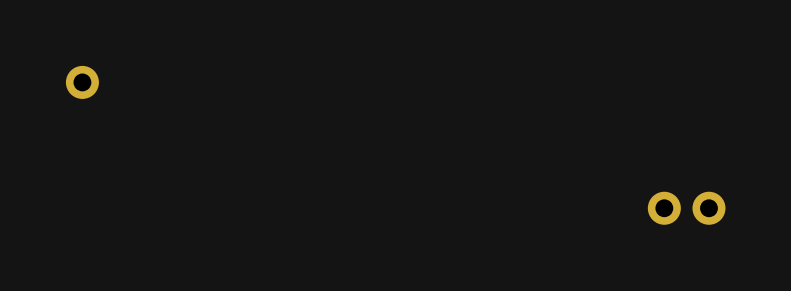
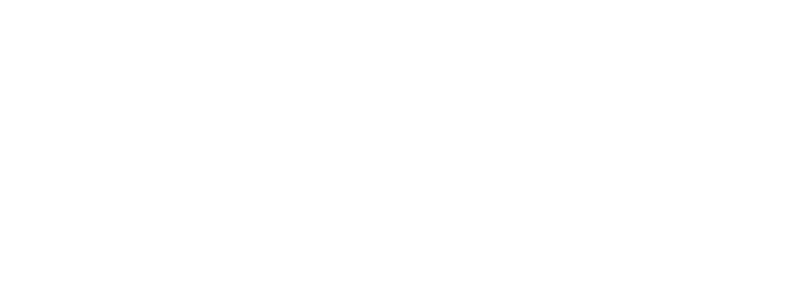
part: (82, 82) -> none
part: (686, 208) -> none

